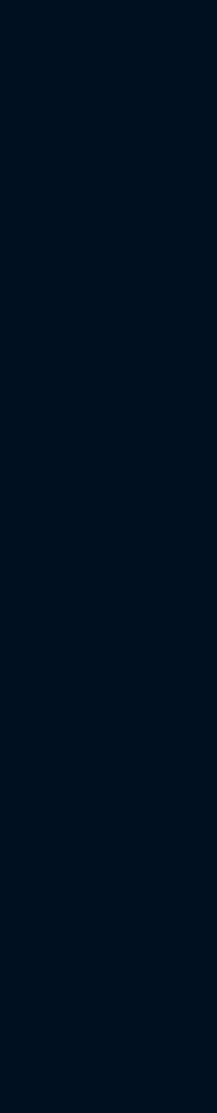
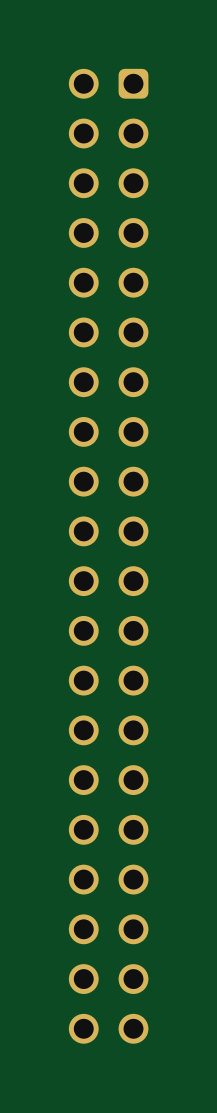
part: none -> (108, 556)

